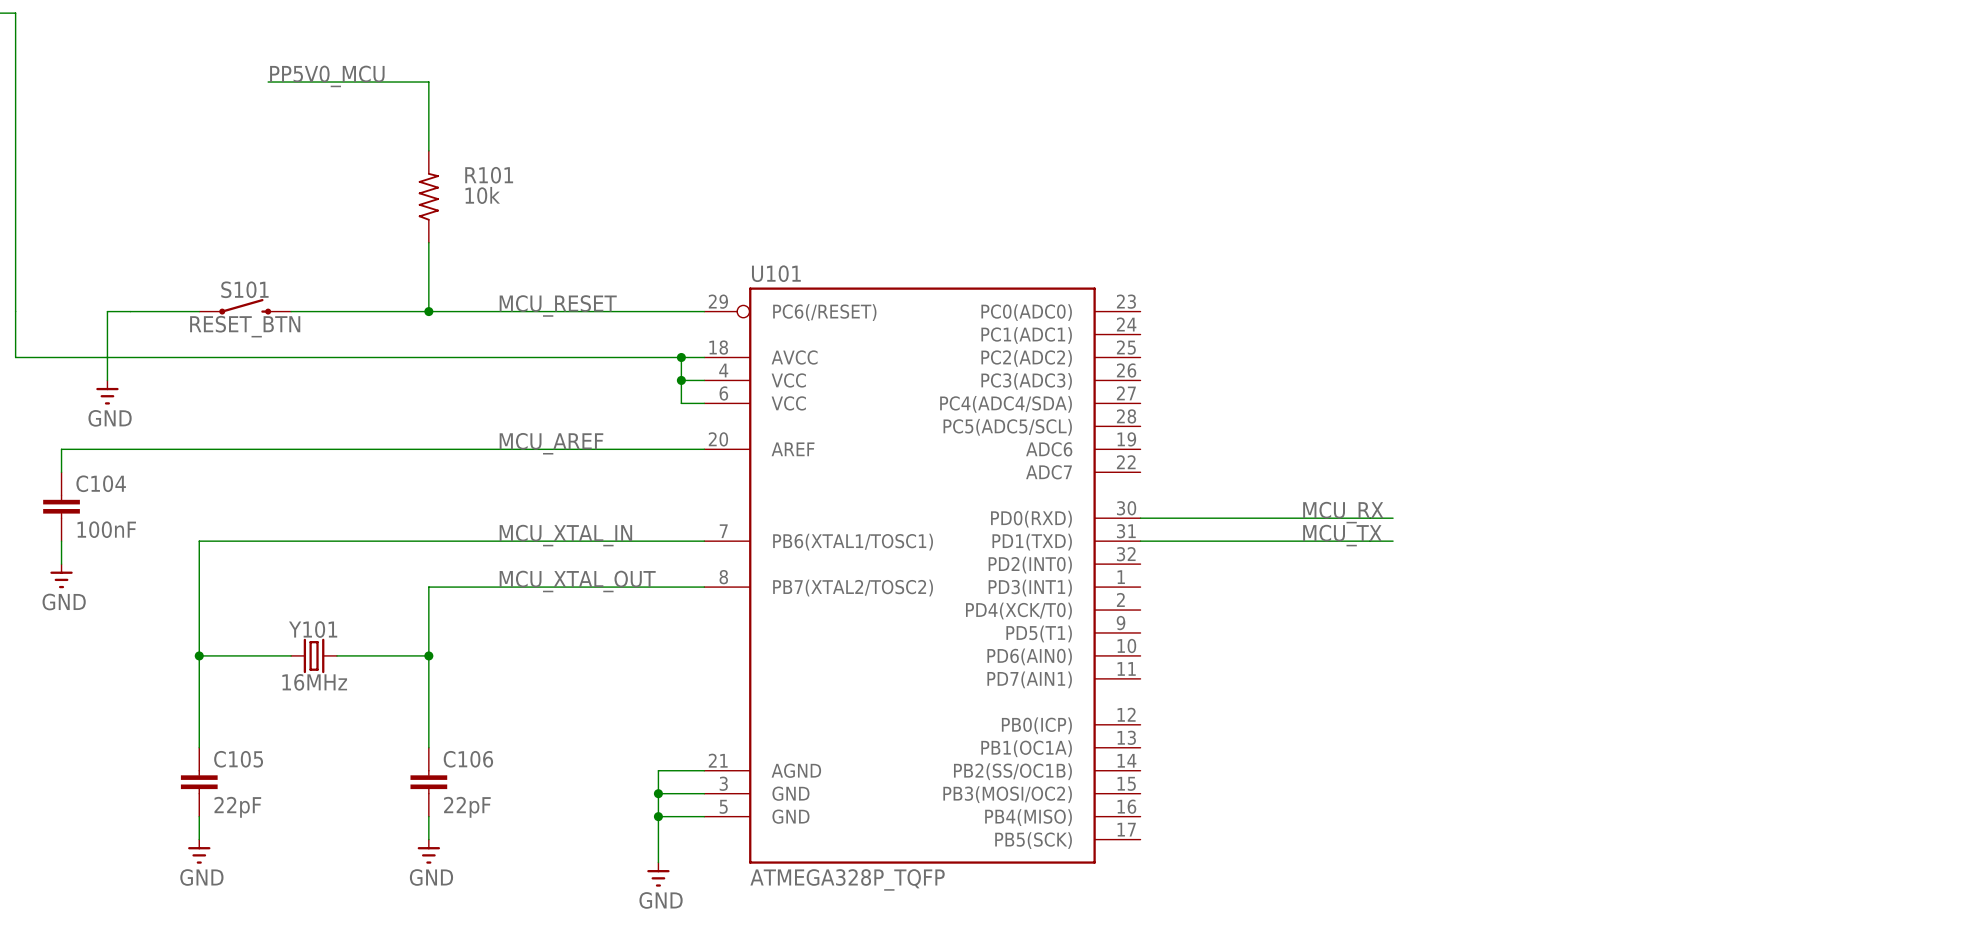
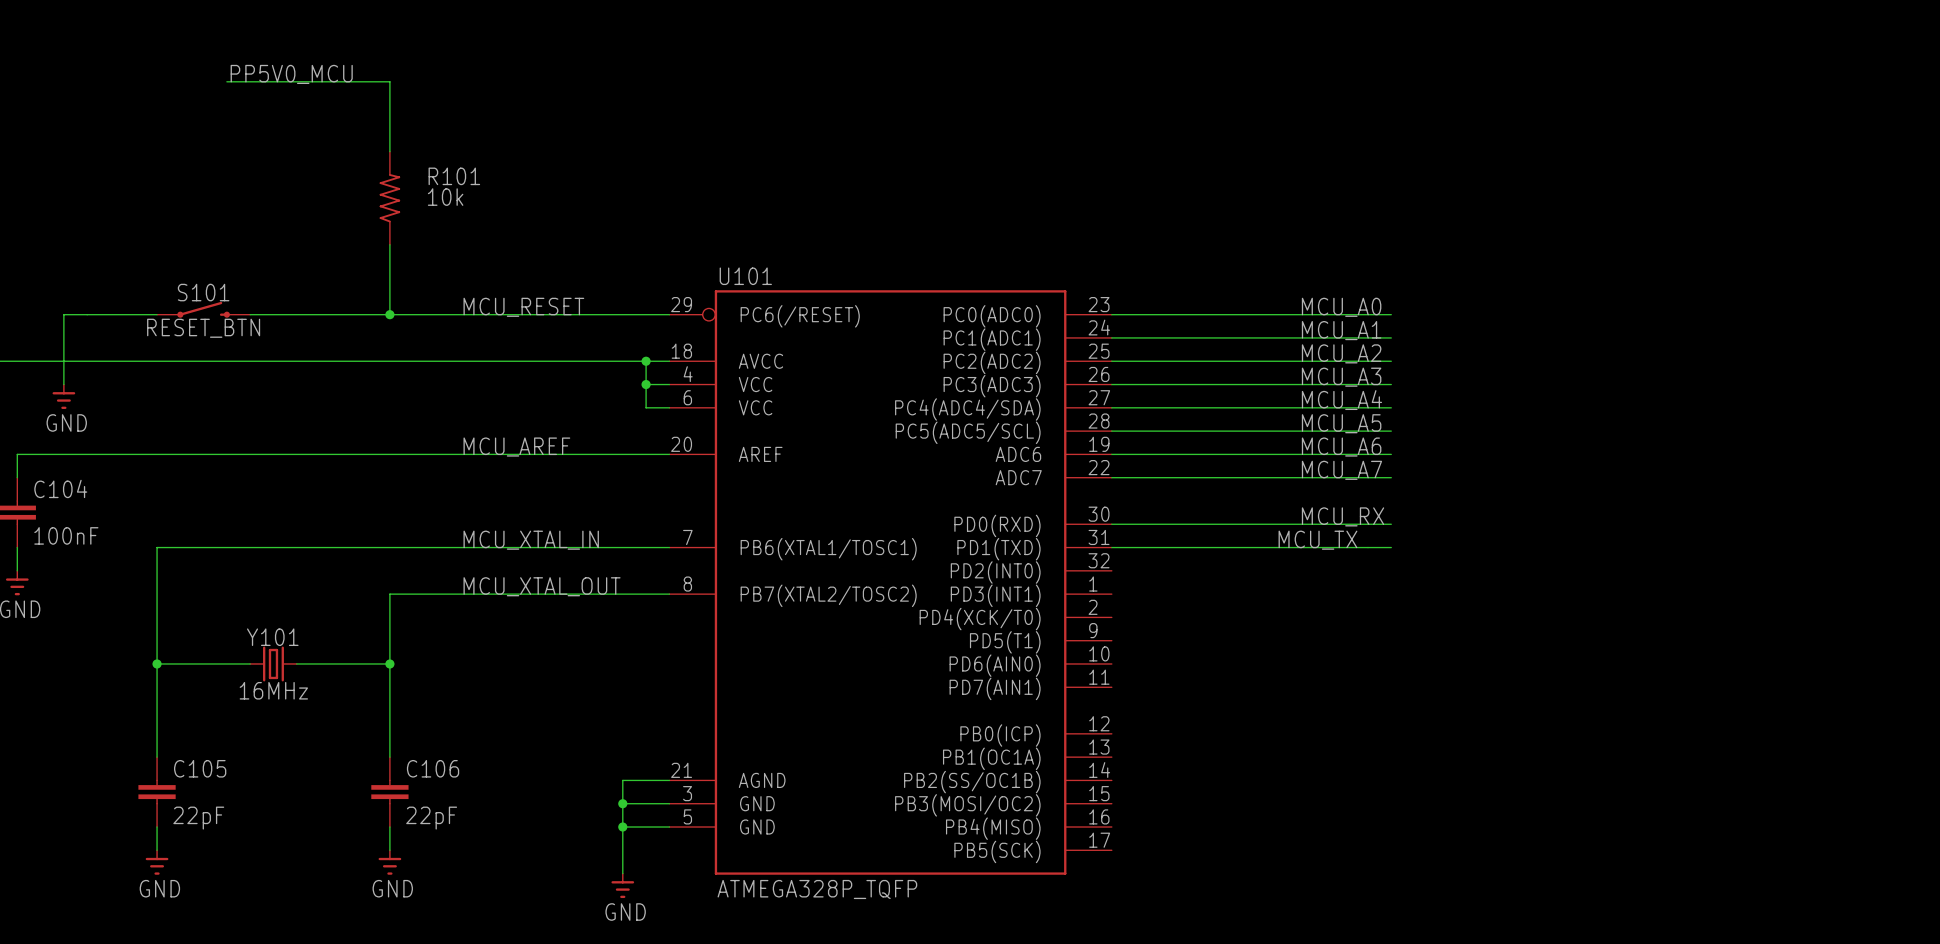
label: none -> MCU_A0 (1341, 307)
wire: none -> (1111, 314) (1391, 314)
label: none -> MCU_A1 (1341, 330)
wire: none -> (1111, 337) (1391, 337)
label: none -> MCU_A2 (1341, 353)
wire: none -> (1111, 361) (1391, 361)
label: none -> MCU_A3 (1341, 377)
wire: none -> (1111, 384) (1391, 384)
label: none -> MCU_A4 (1341, 400)
wire: none -> (1111, 407) (1391, 407)
label: none -> MCU_A5 (1341, 423)
wire: none -> (1111, 431) (1391, 431)
label: none -> MCU_A6 (1341, 447)
wire: none -> (1111, 454) (1391, 454)
label: none -> MCU_A7 (1341, 470)
wire: none -> (1111, 477) (1391, 477)
label position: MCU_RX (1343, 512) -> MCU_RX (1343, 516)
wire: none -> (1367, 524) (1391, 524)
wire: none -> (1367, 547) (1391, 547)

